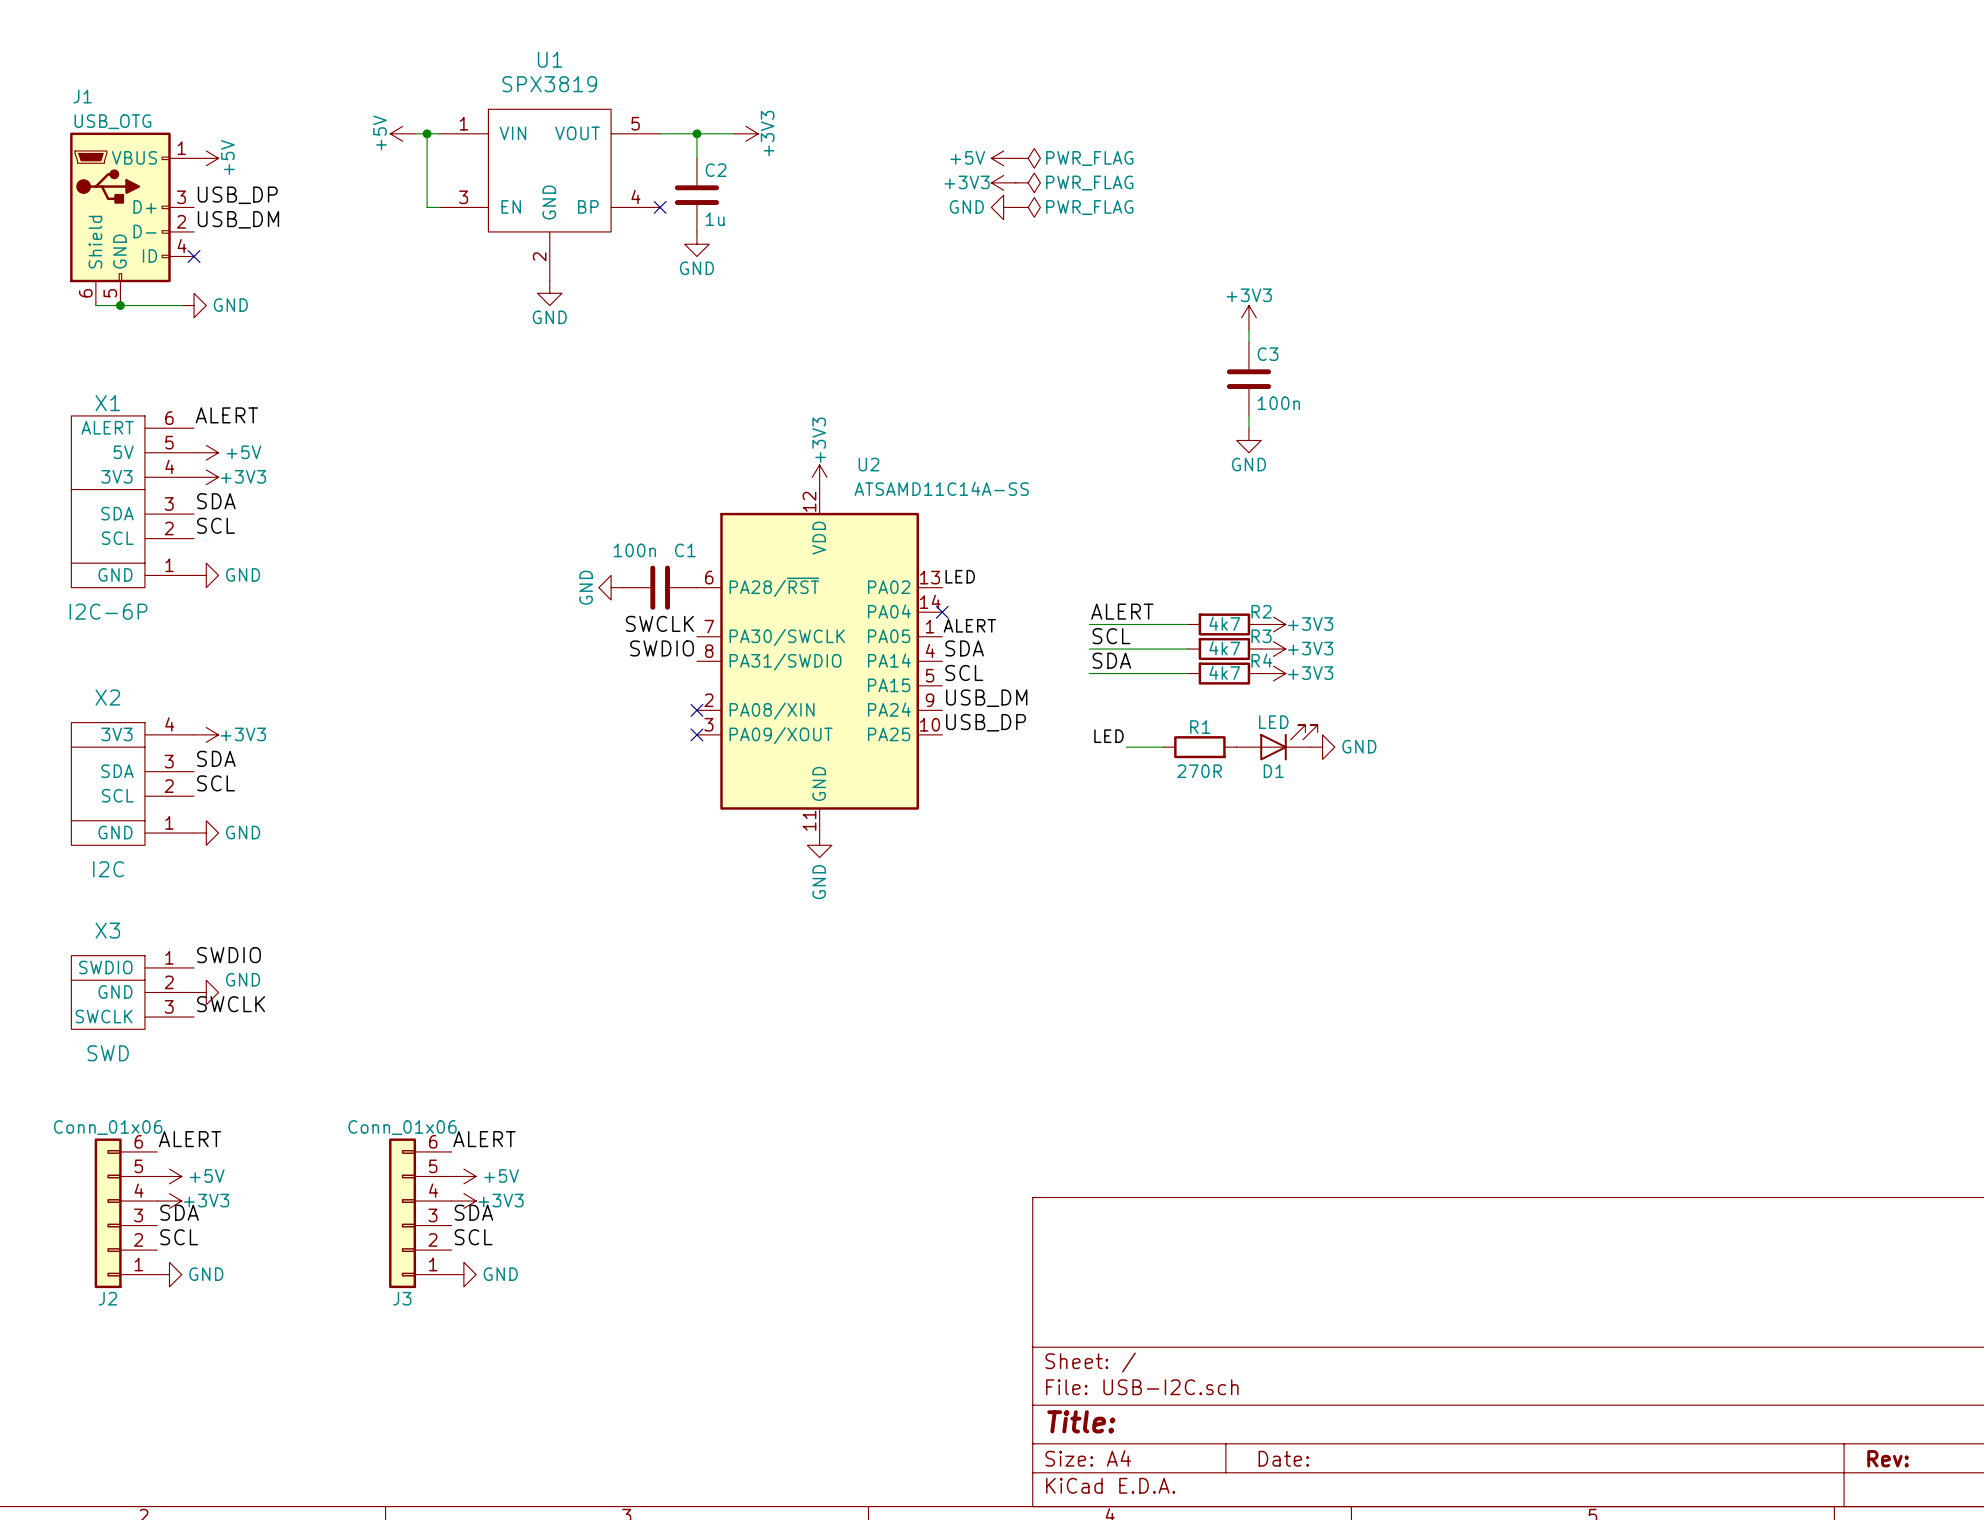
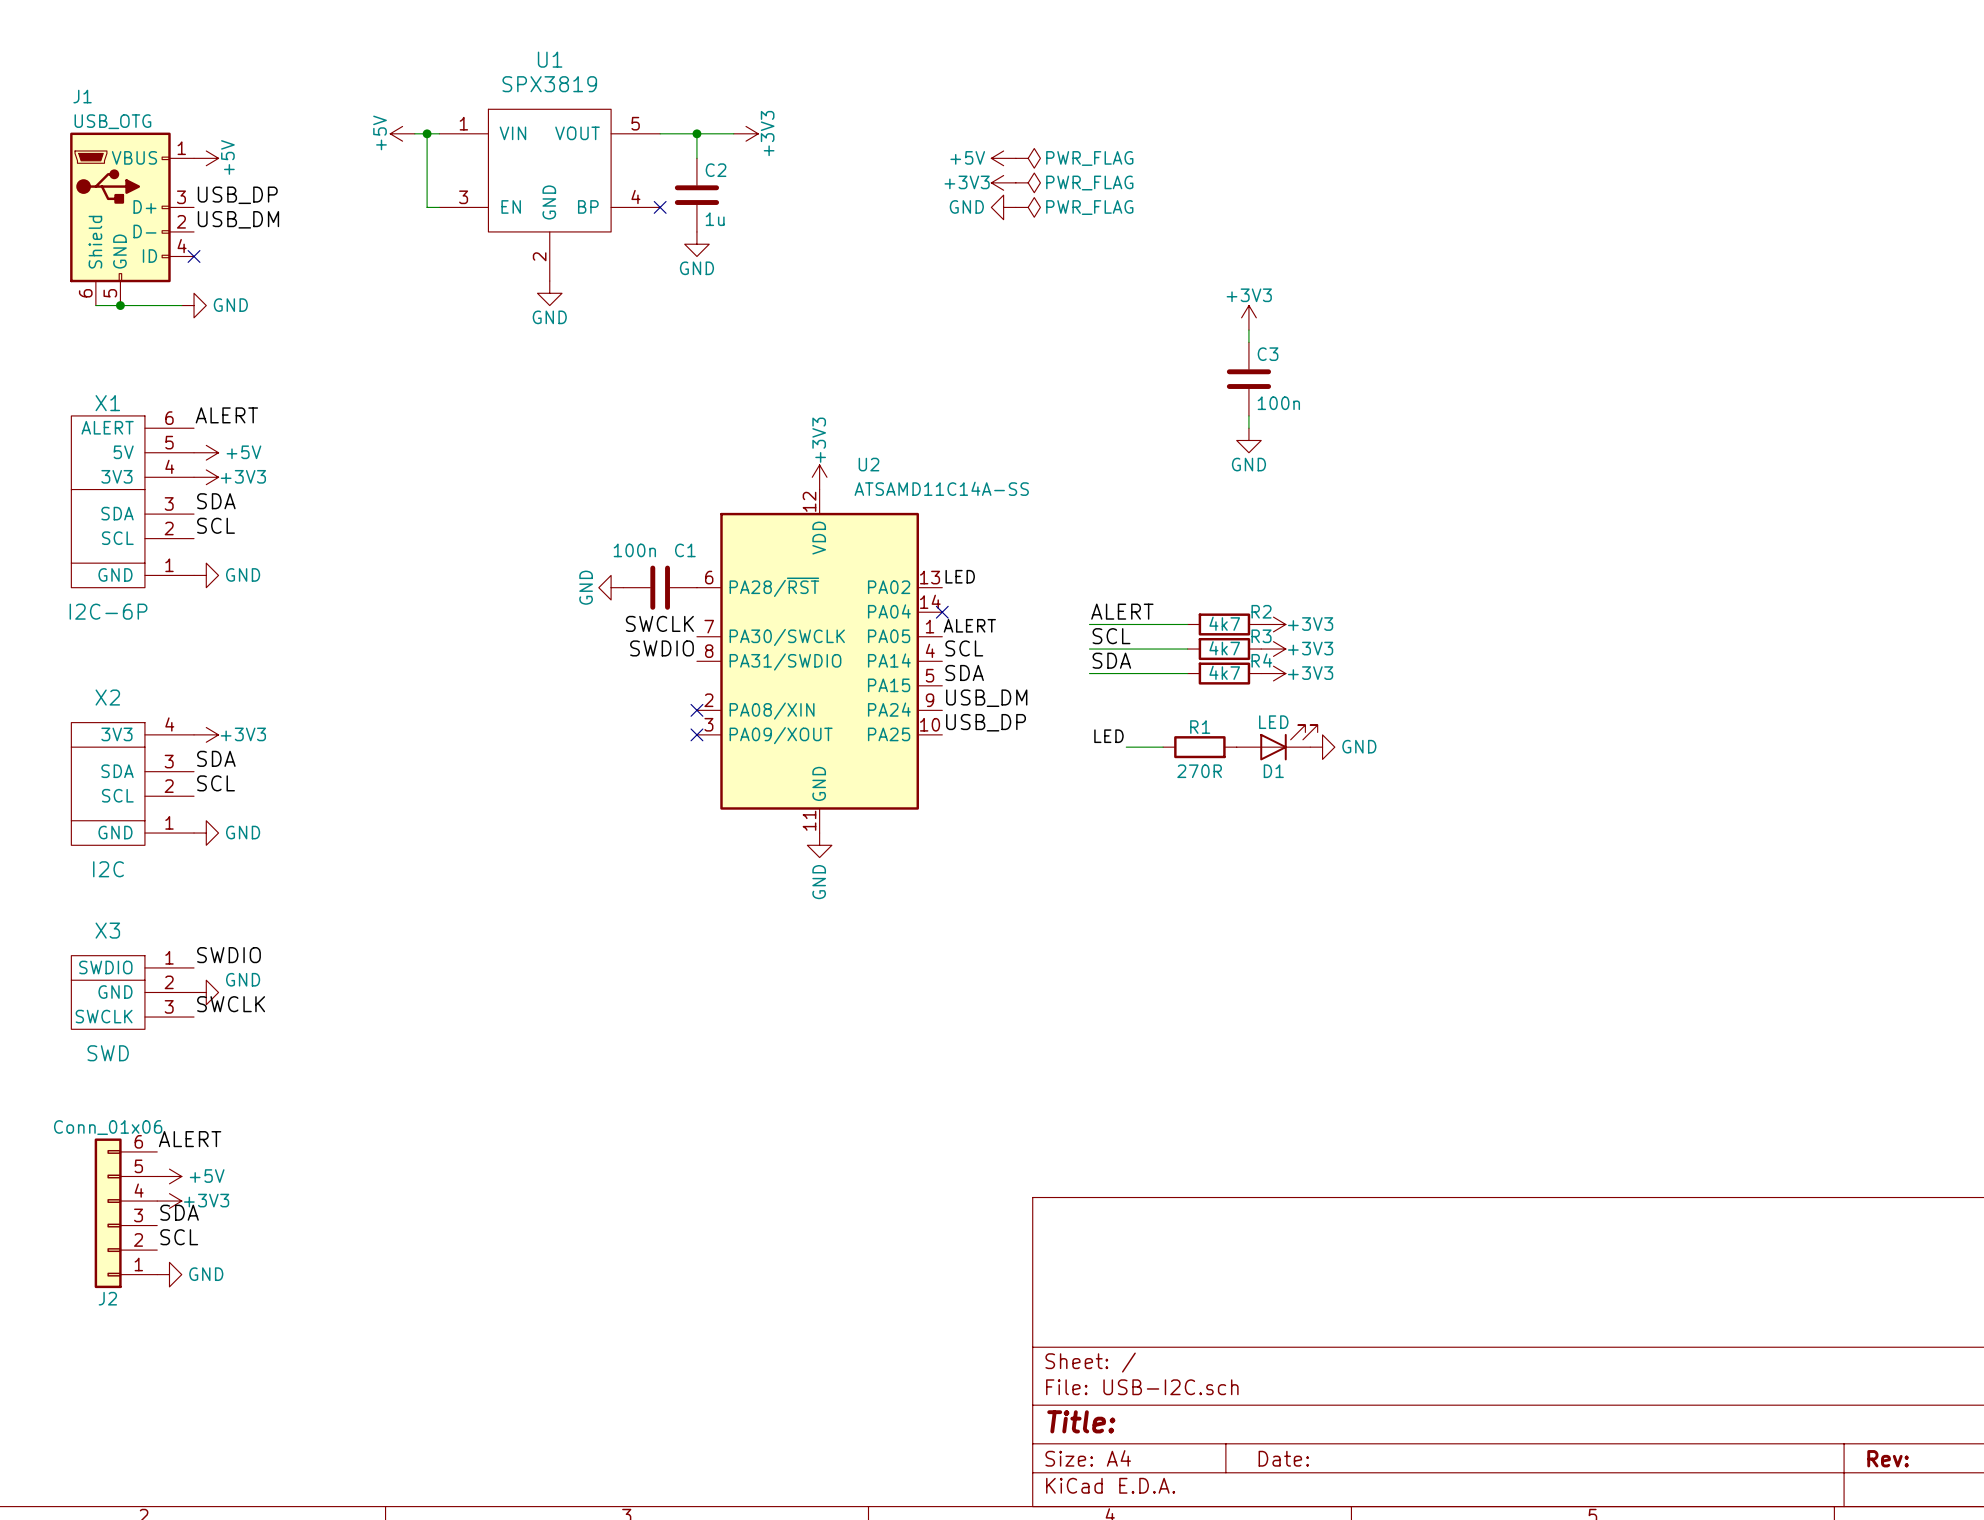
label: SDA (964, 648) -> SCL (964, 648)
label: SCL (964, 672) -> SDA (964, 672)
label: ALERT (484, 1139) -> none
power symbol: +5V (463, 1176) -> none
power symbol: +3V3 (463, 1201) -> none
label: SDA (473, 1212) -> none
J3: Conn_01x06 (420, 1213) -> none
label: SCL (473, 1237) -> none
power symbol: GND (463, 1274) -> none

